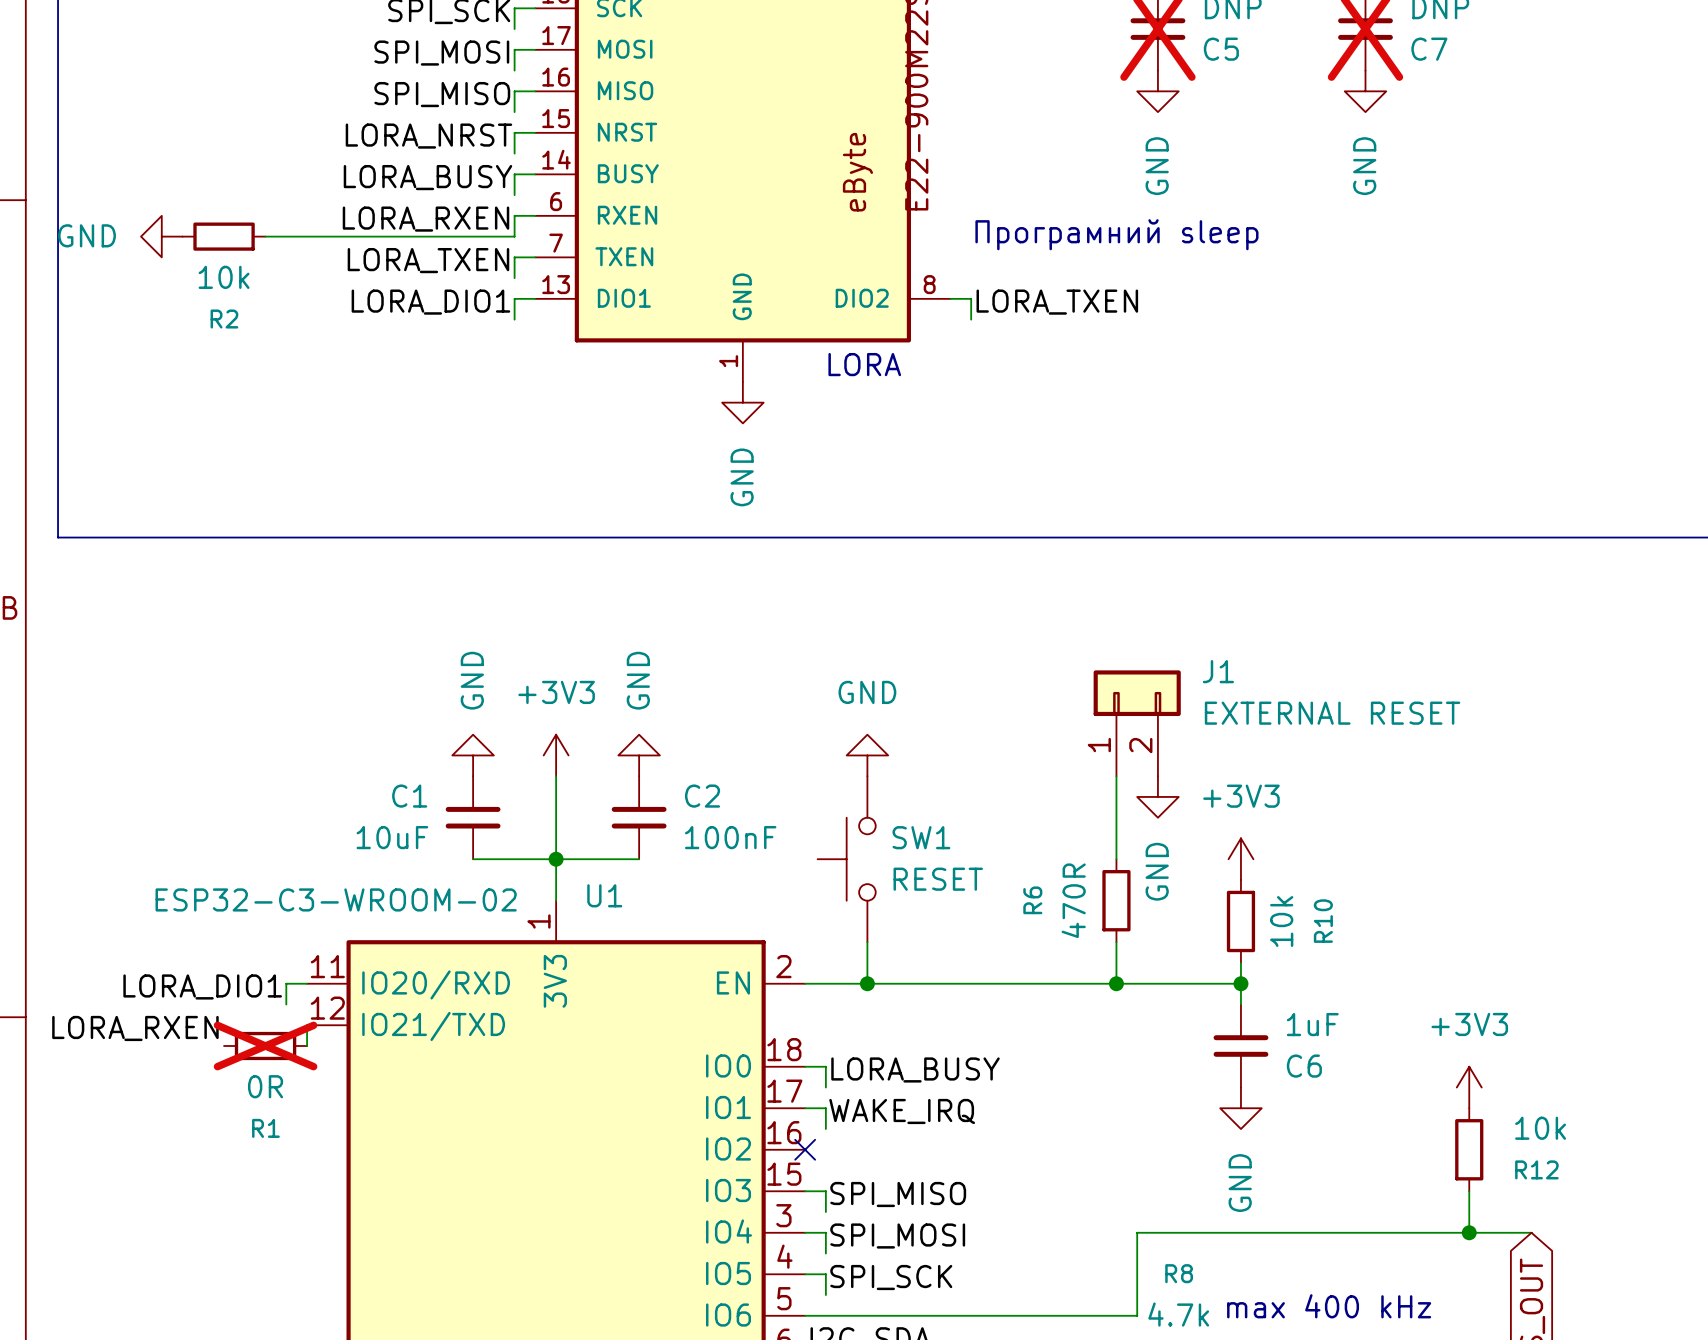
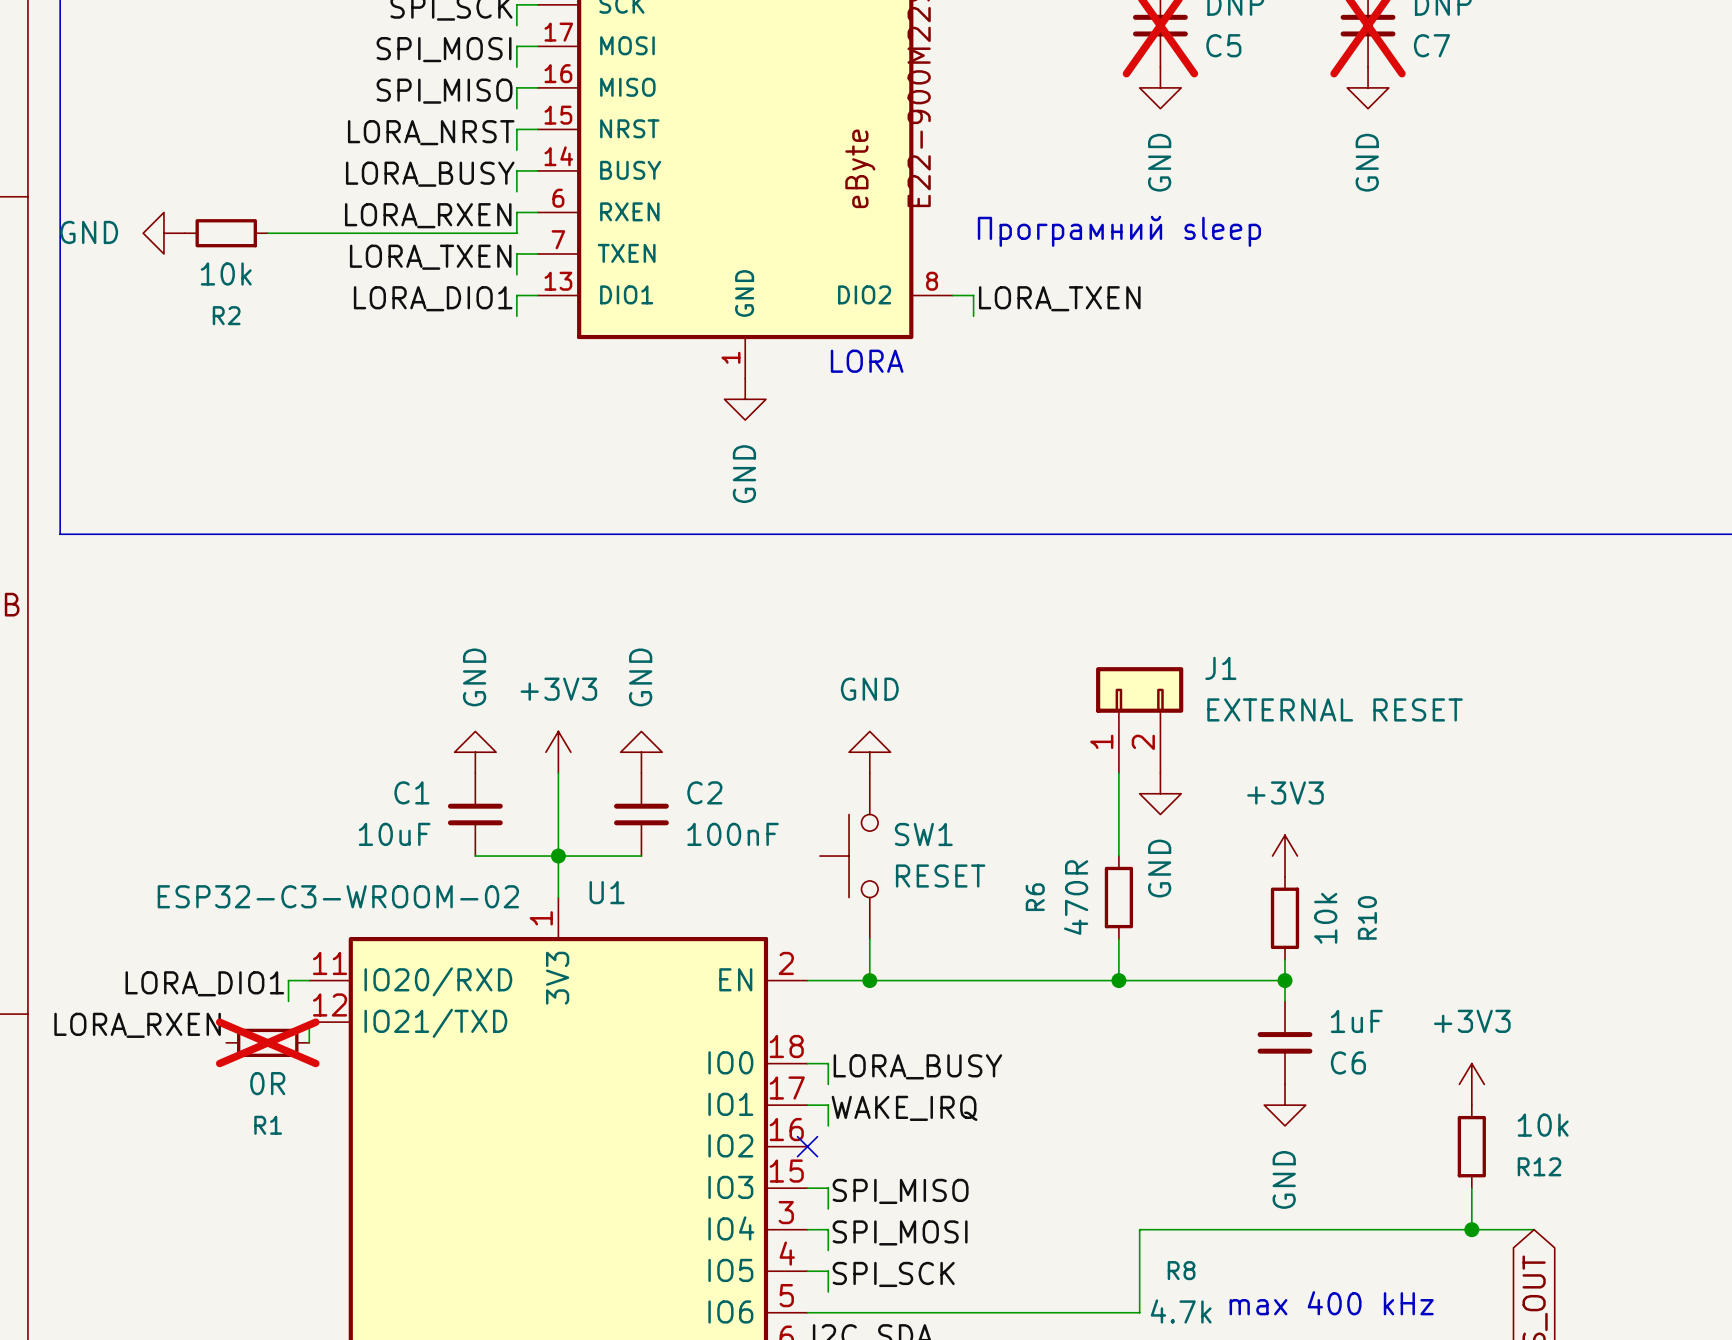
power symbol position: +3V3 (1240, 859) -> +3V3 (1284, 856)
R10 position: (1240, 921) -> (1284, 918)
wire: (1240, 962) (1240, 1004) -> (1284, 959) (1284, 1001)
wire: none -> (1243, 980) (1284, 980)
junction position: (1240, 983) -> (1284, 980)
C6 position: (1240, 1046) -> (1284, 1042)
power symbol position: GND (1240, 1108) -> GND (1284, 1105)

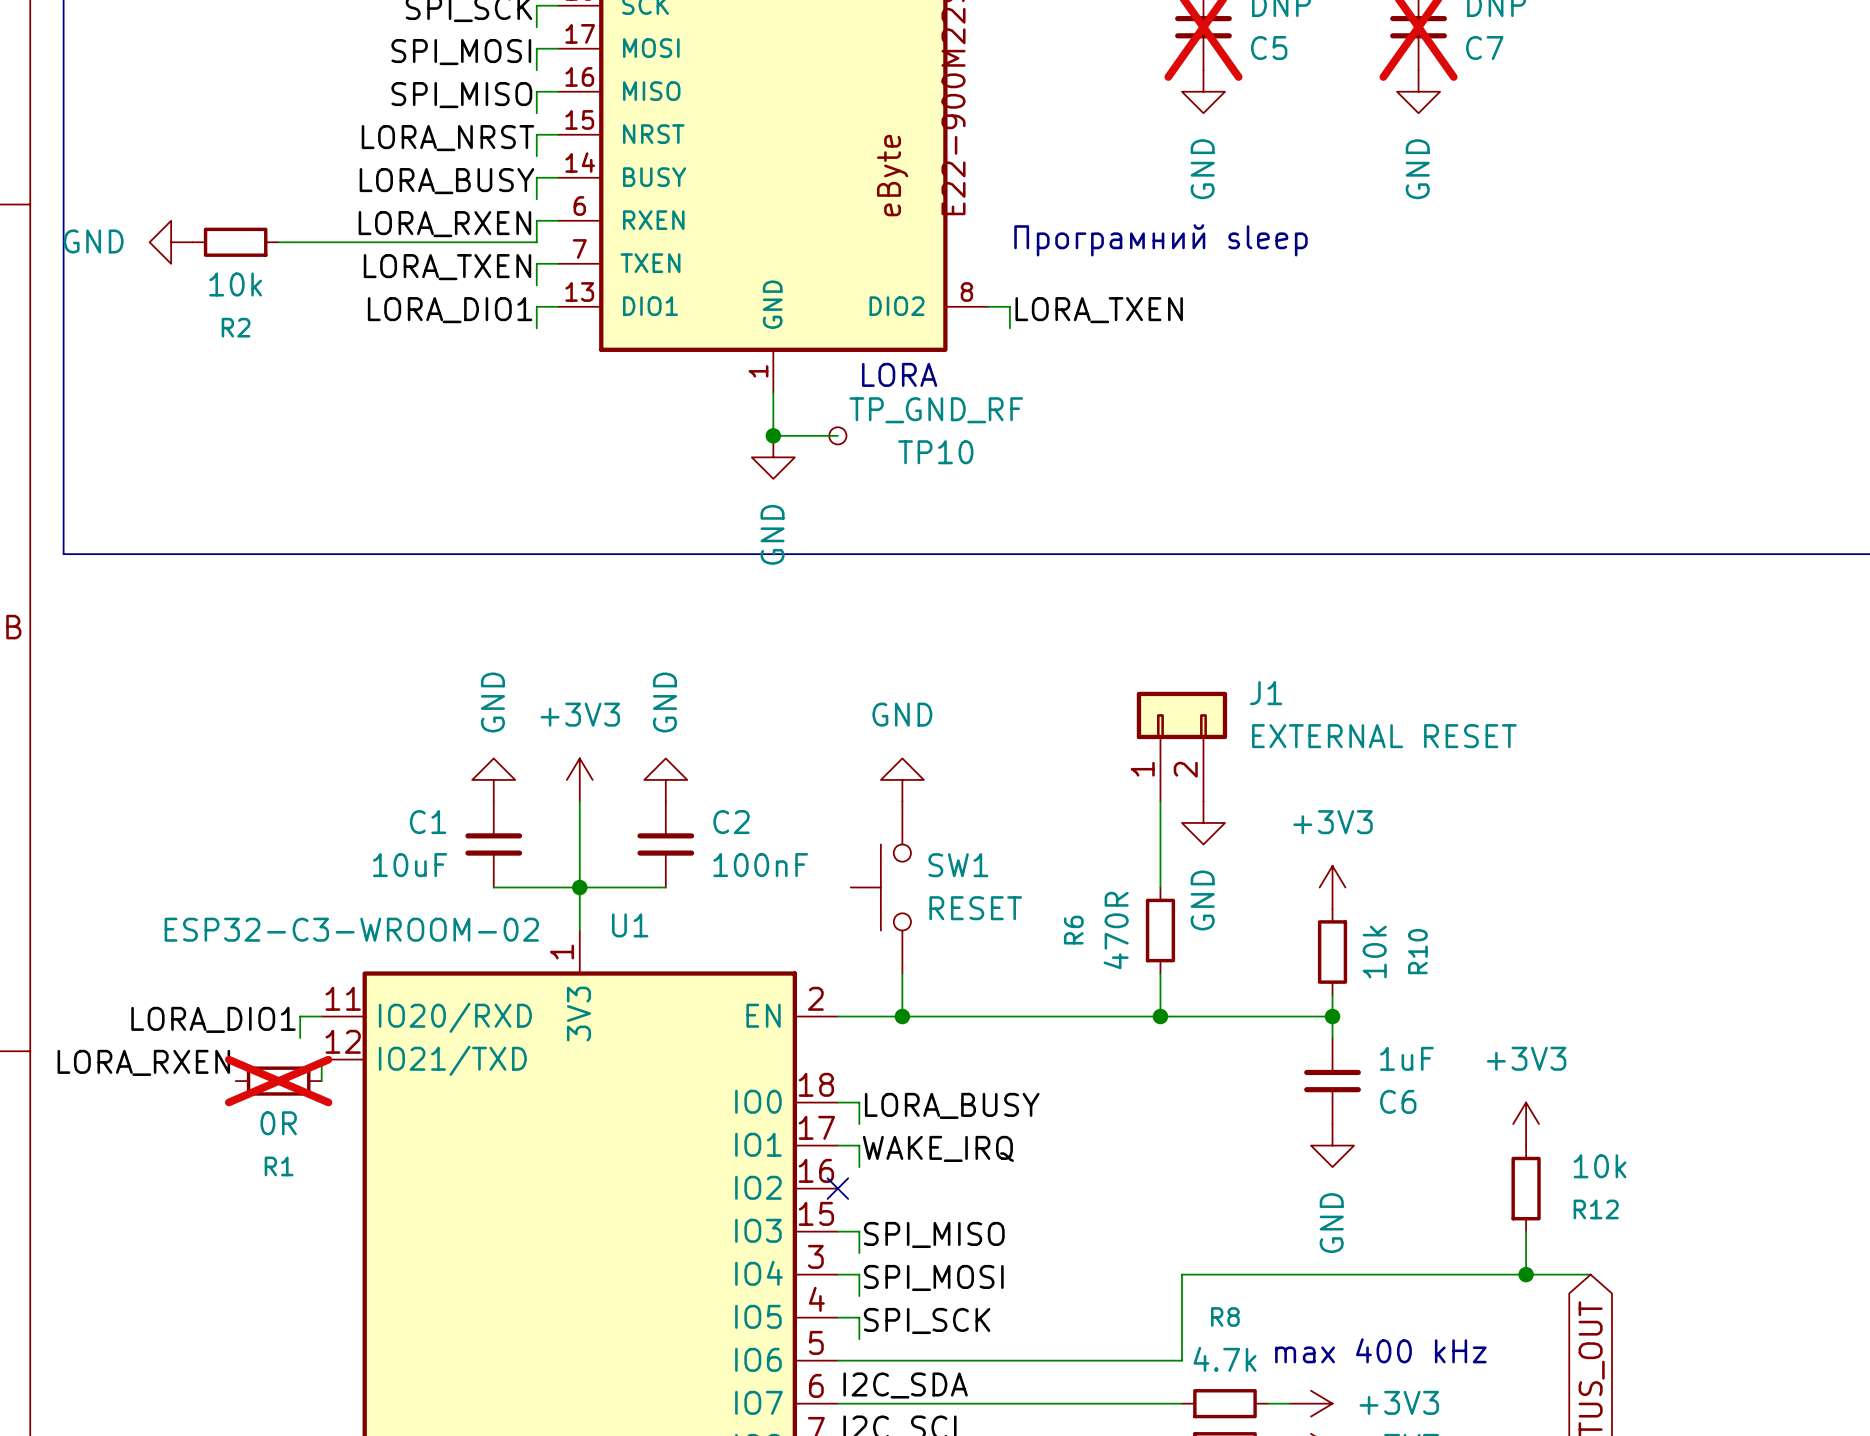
wire: none -> (773, 392) (773, 435) (837, 435)
power symbol position: GND (745, 399) -> GND (773, 457)
junction: none -> (773, 435)
TP10: none -> TP_GND_RF (837, 435)

